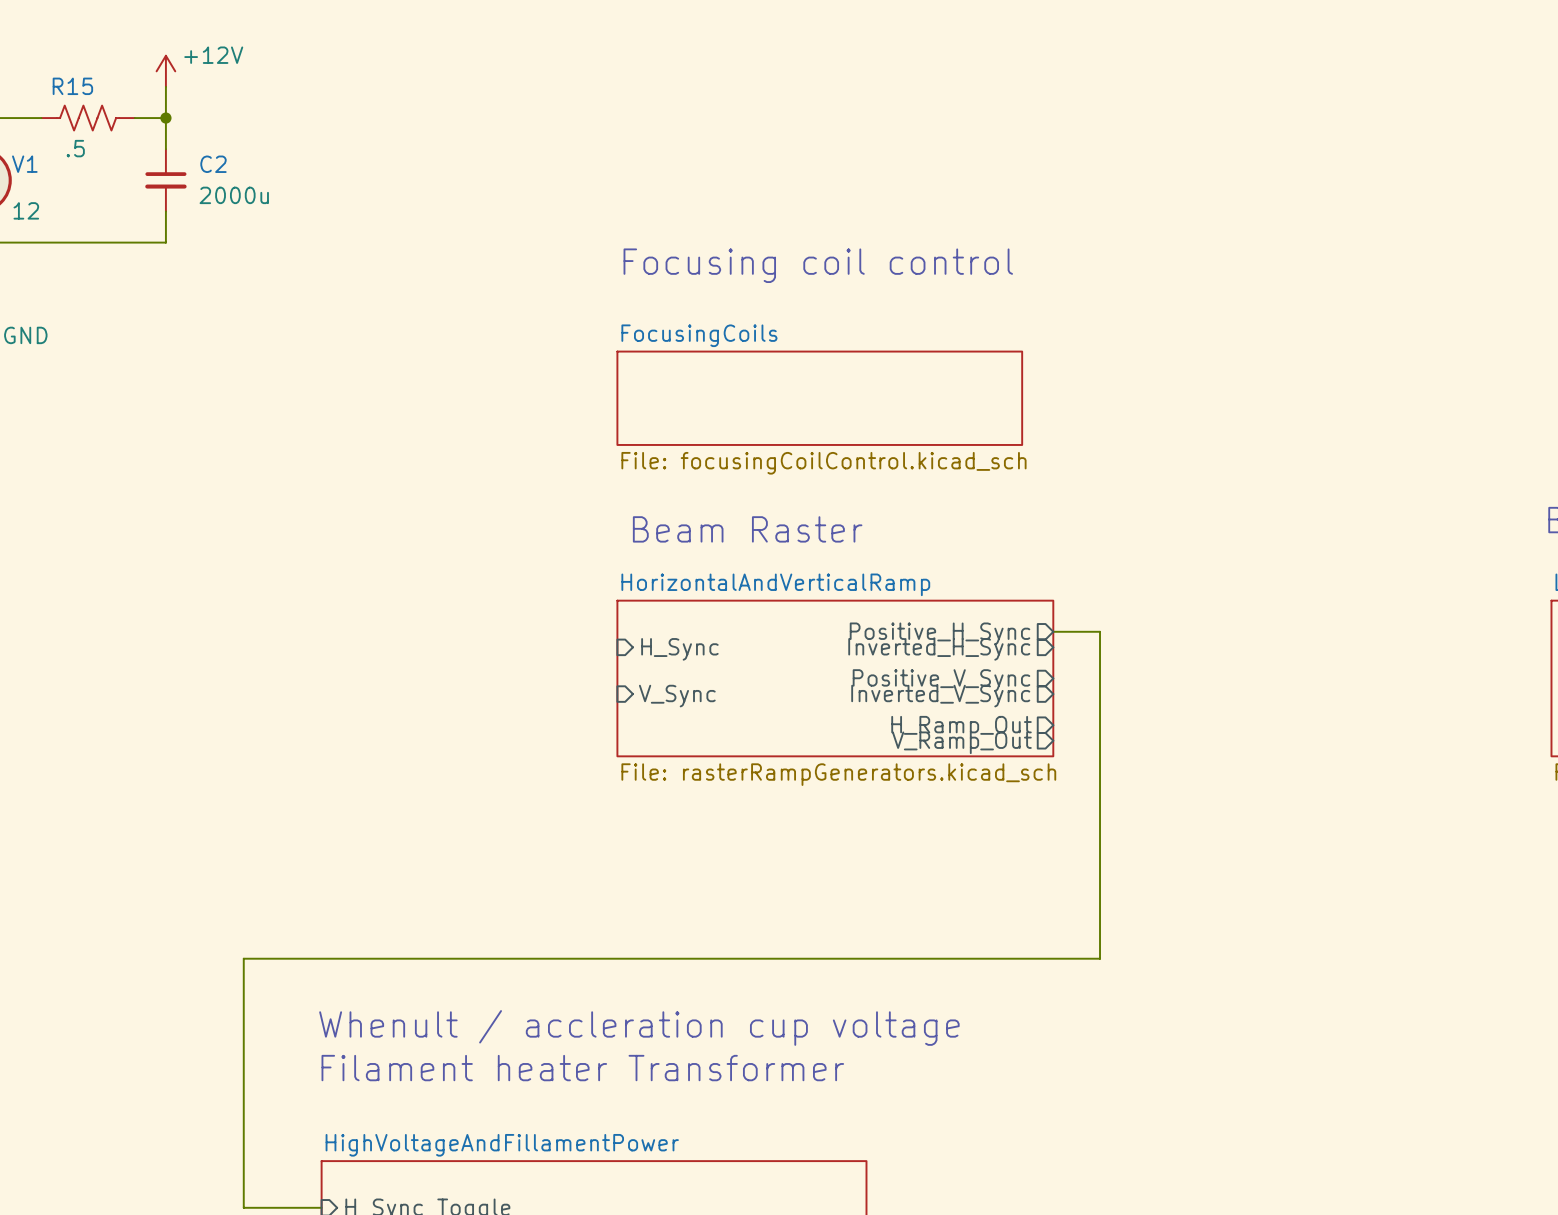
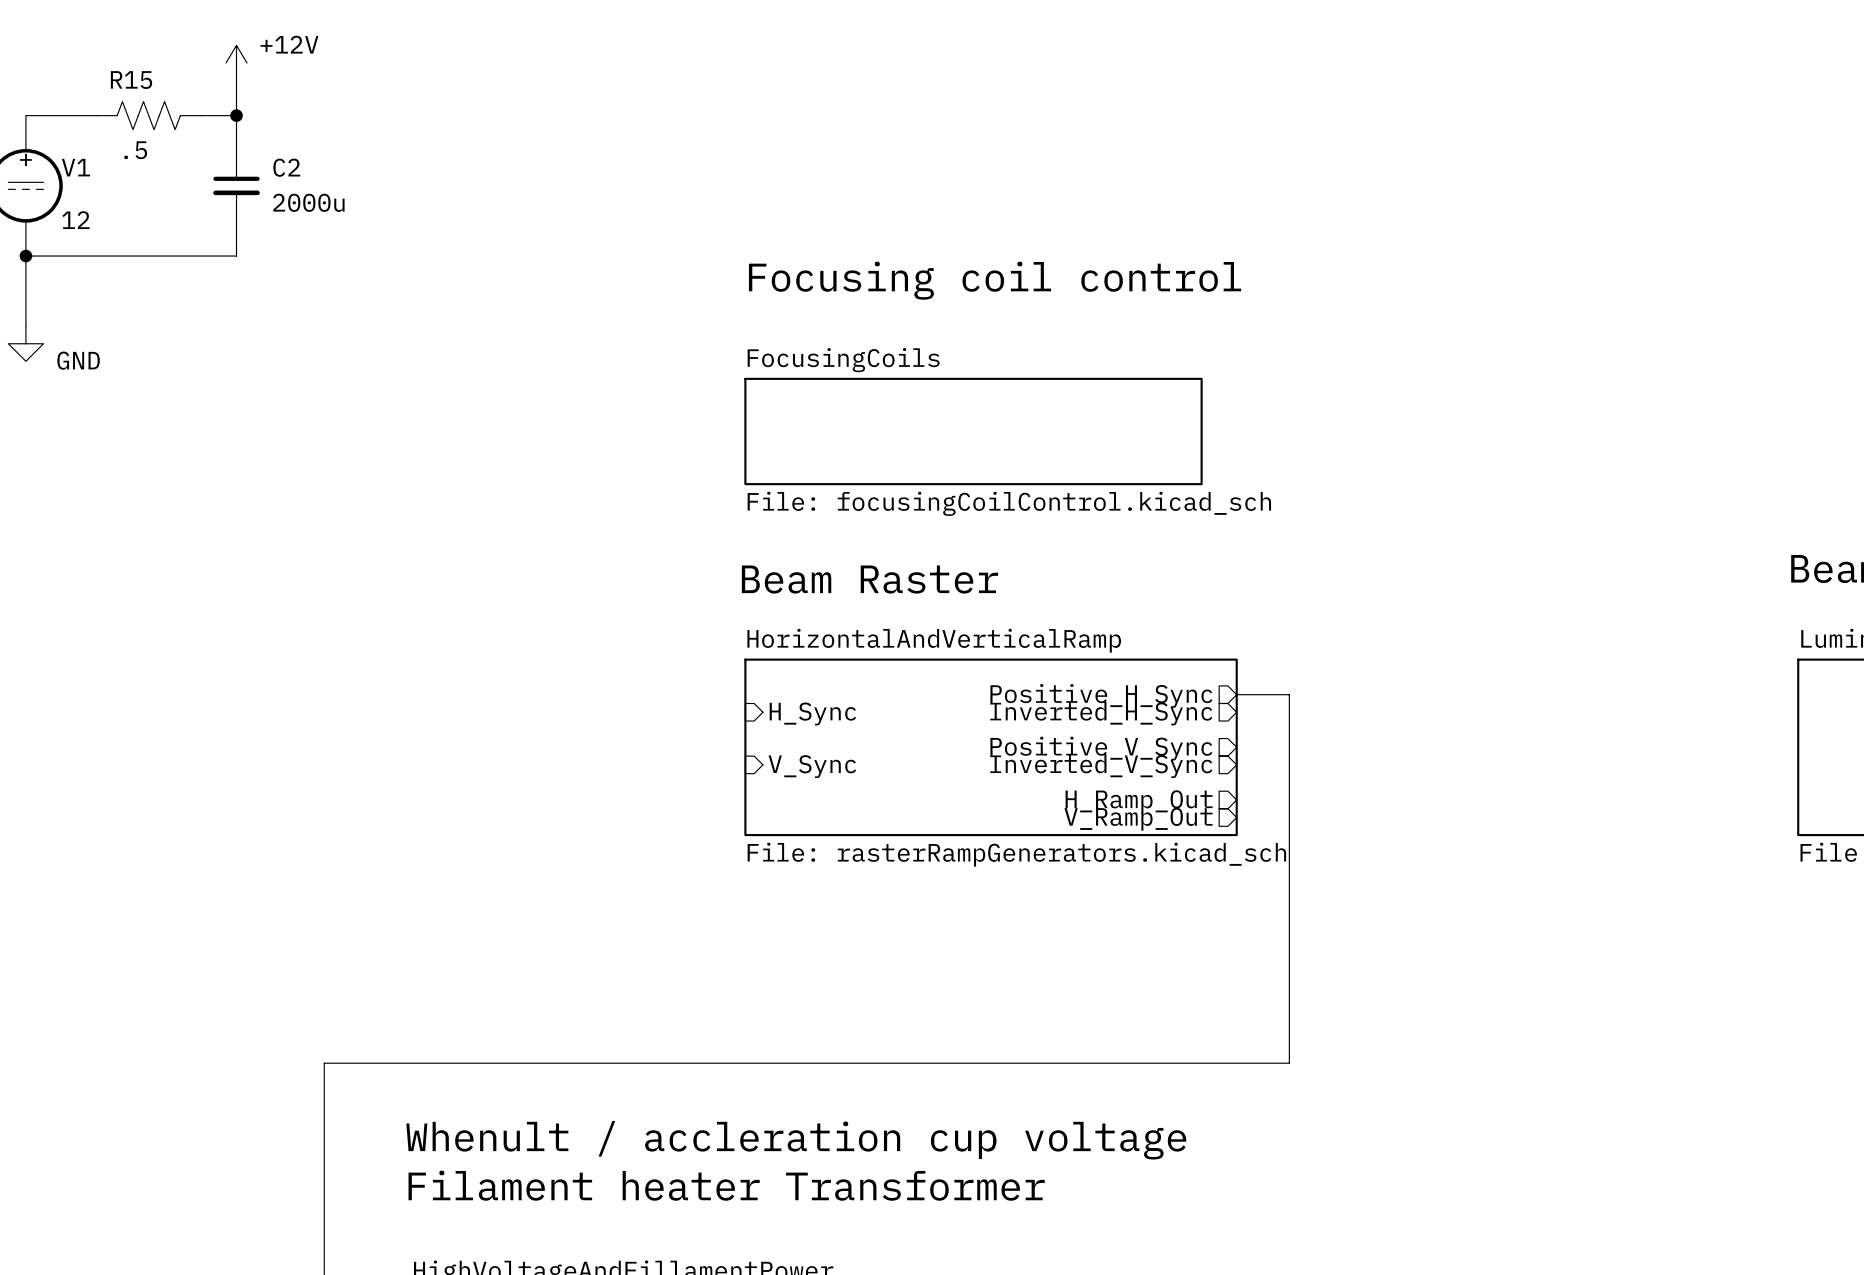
text position: Beam Raster (747, 529) -> Beam Raster (869, 579)

